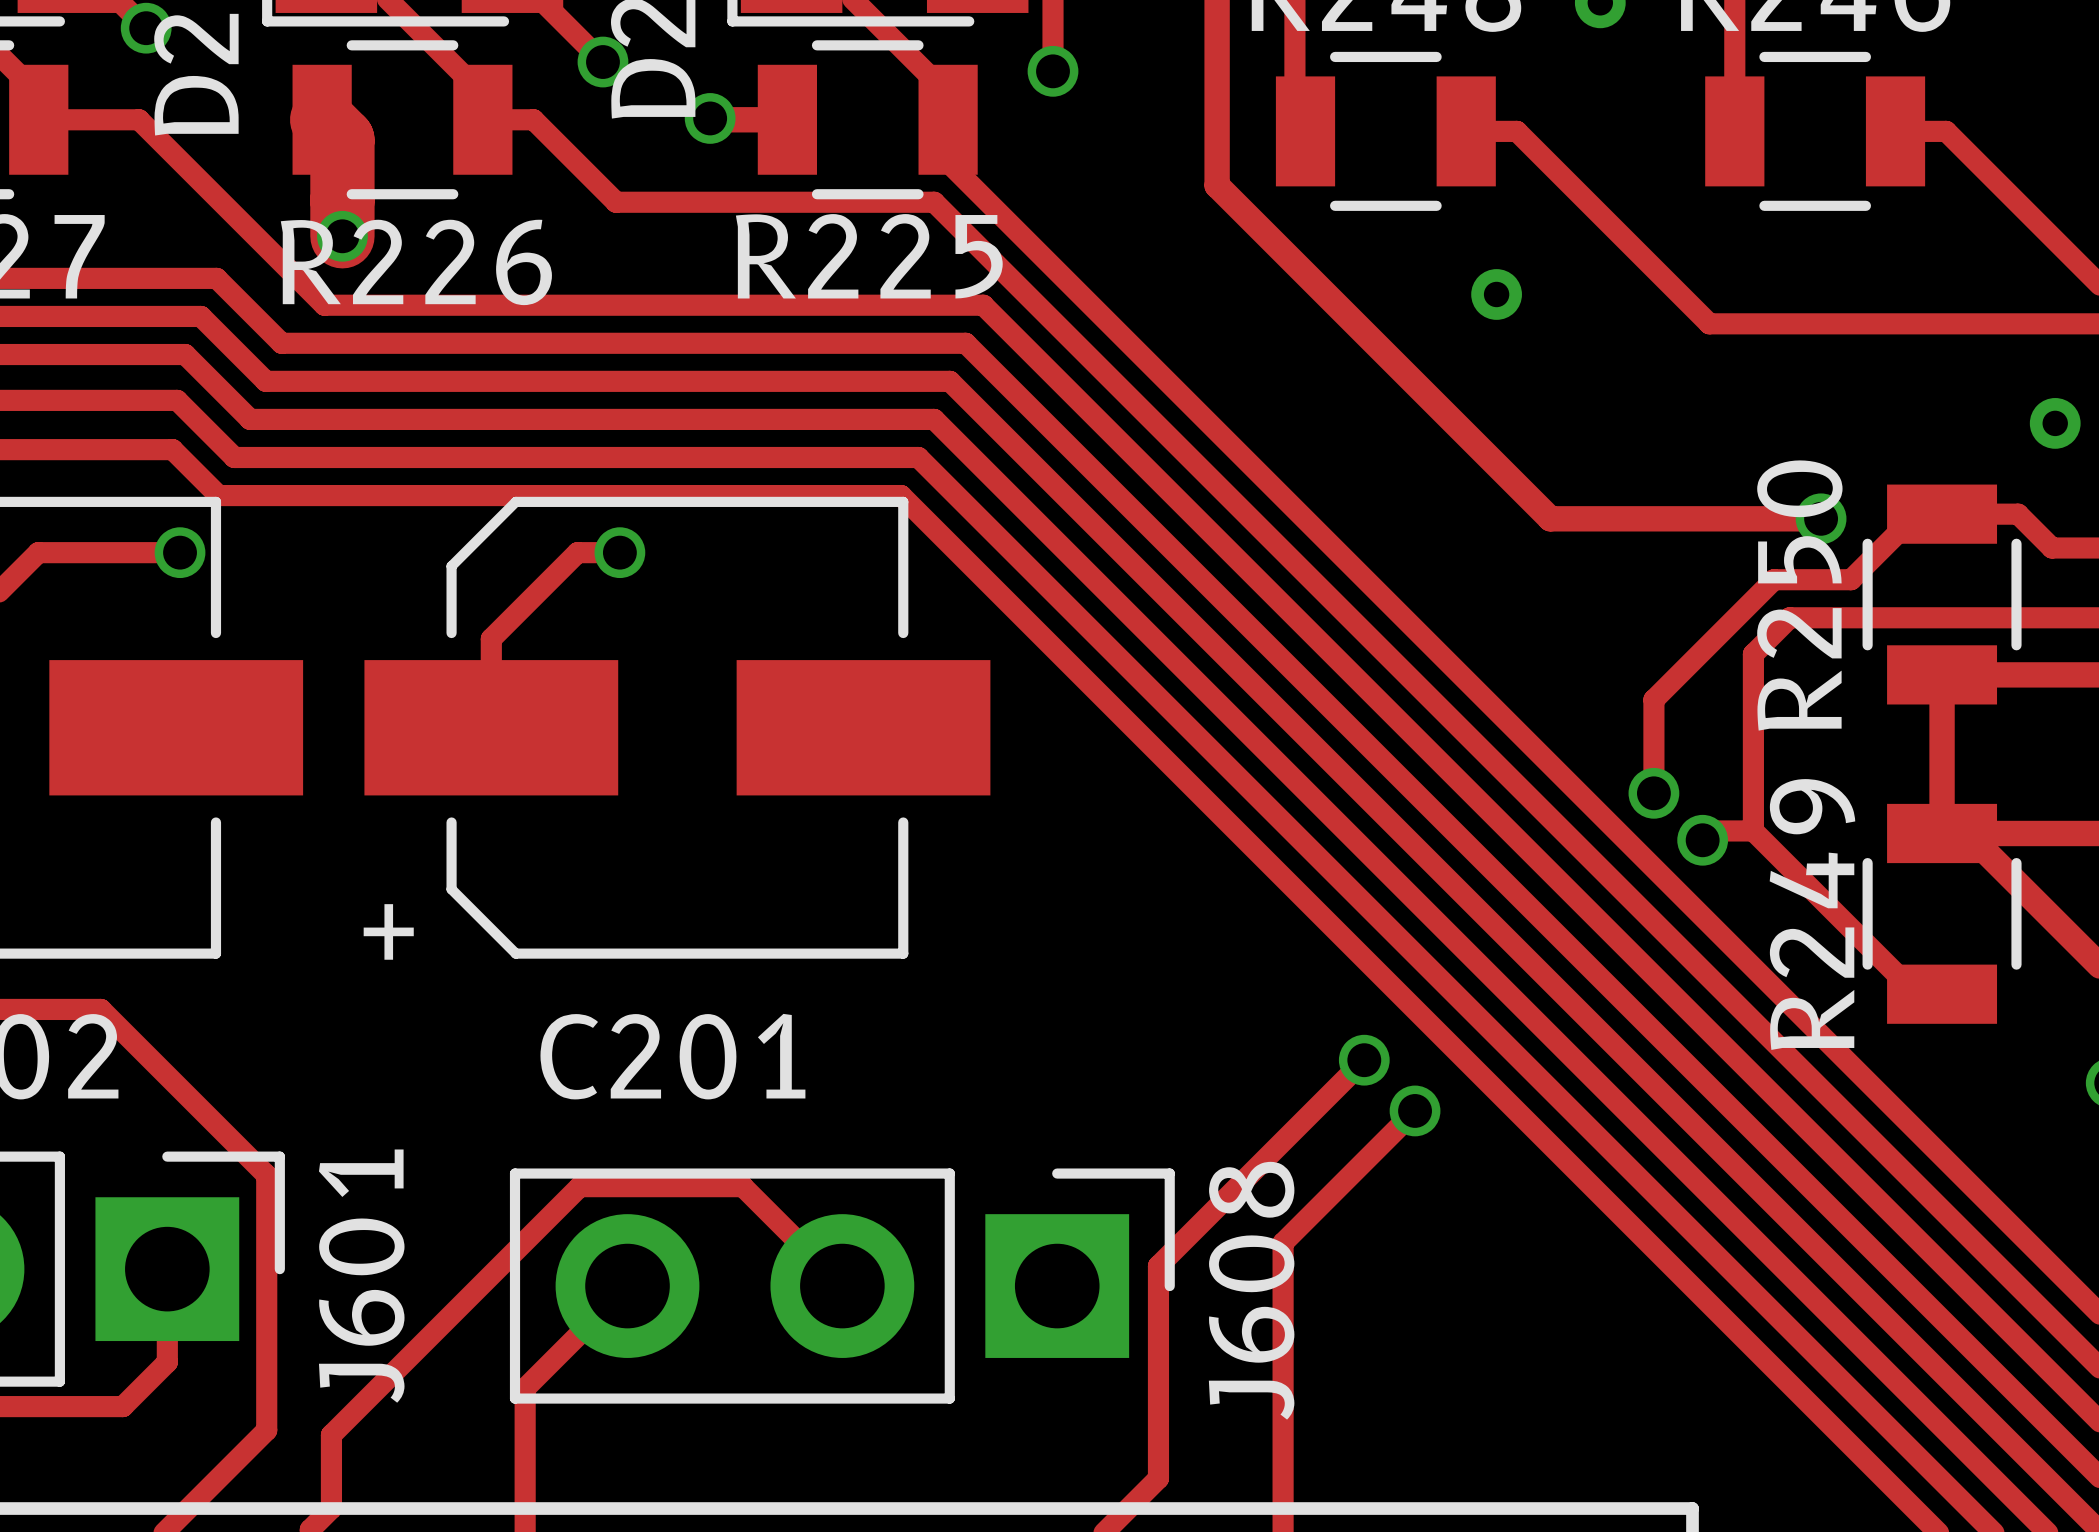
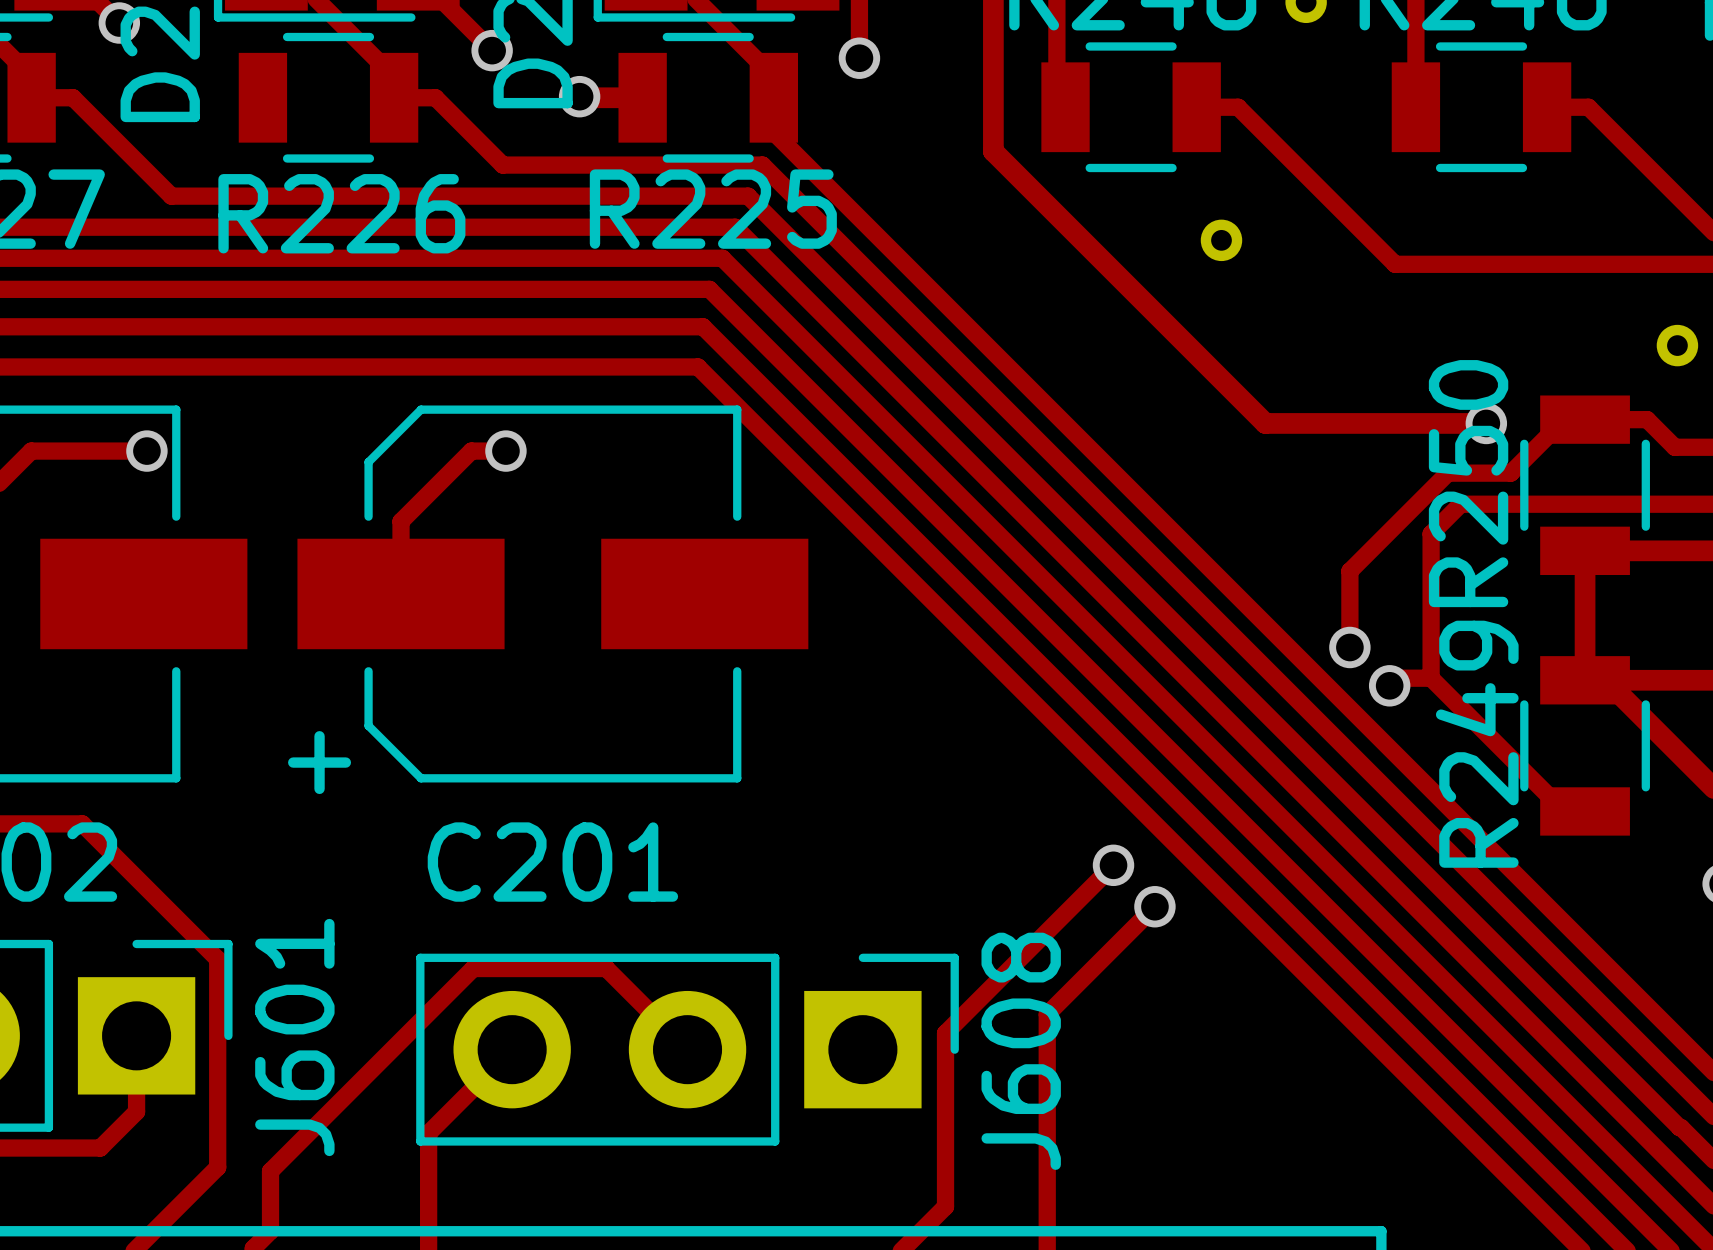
track: (89, 119) (139, 119) (324, 305) (983, 305) (2059, 1381) -> (73, 97) (171, 196) (748, 196) (1681, 1127)
track: (322, 119) (342, 140) (342, 236) -> none
via: (342, 236) -> none
track: (216, 278) (281, 343) (965, 343) -> (176, 227) (735, 227) (788, 280)
track: (200, 316) (265, 381) (949, 381) -> (164, 258) (722, 258) (775, 311)
track: (185, 354) (250, 419) (934, 419) -> (151, 289) (709, 289) (762, 342)
track: (177, 400) (234, 457) (918, 457) -> (144, 326) (703, 326) (749, 373)
track: (172, 449) (218, 495) (901, 495) -> (140, 366) (698, 366) (735, 404)

